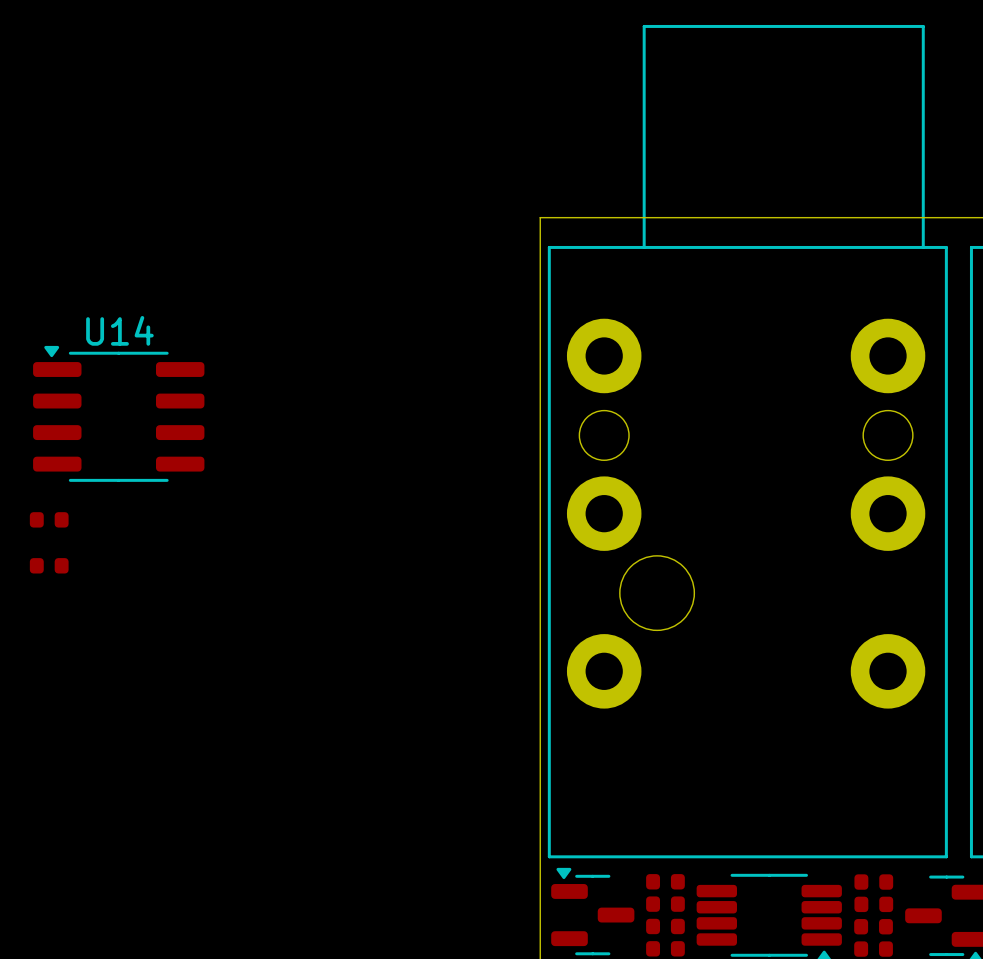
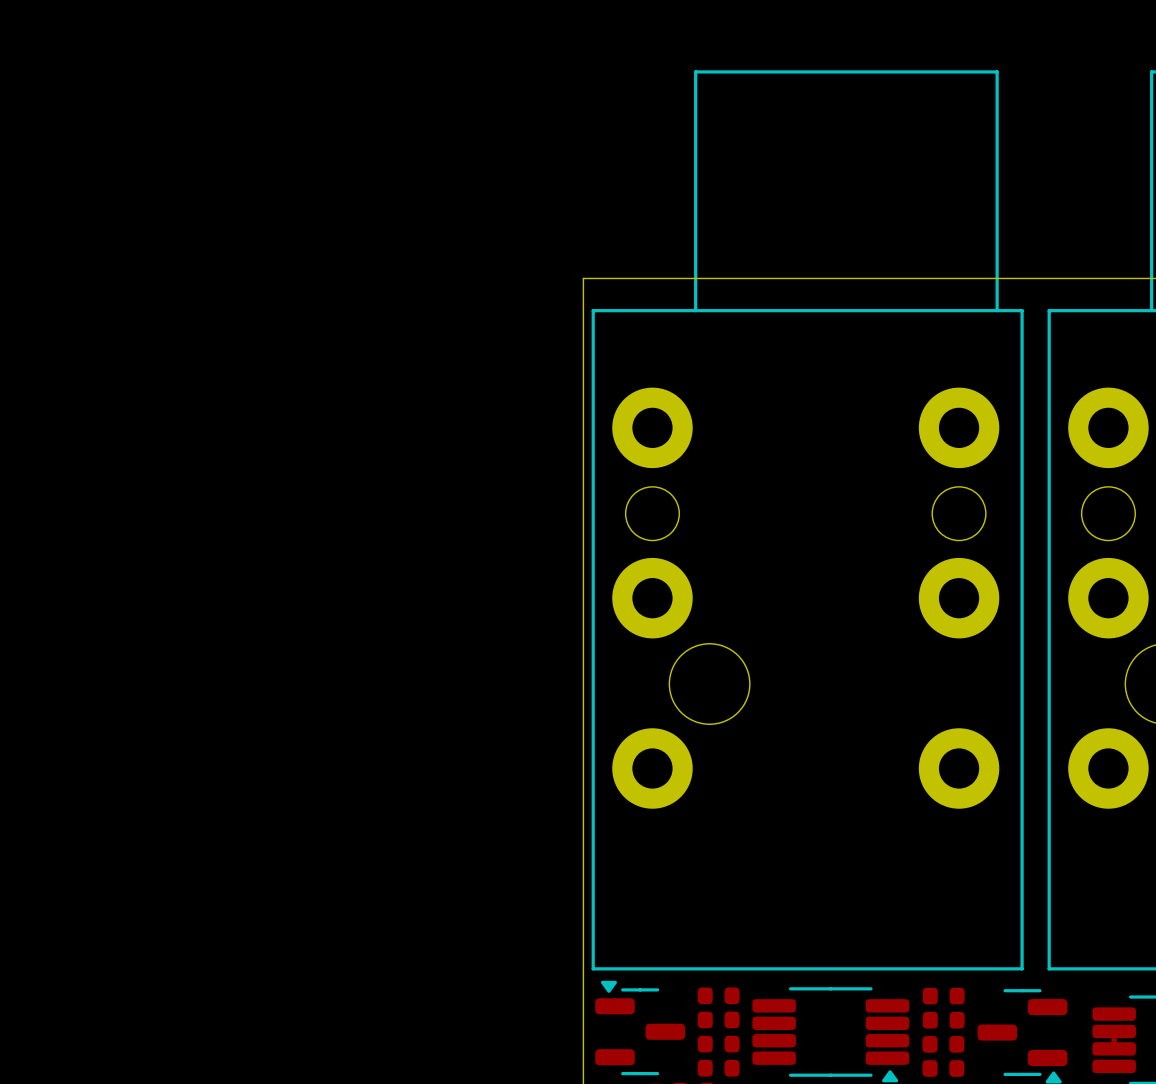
U14: (118, 413) -> none
part: (49, 519) -> none
part: (49, 565) -> none

